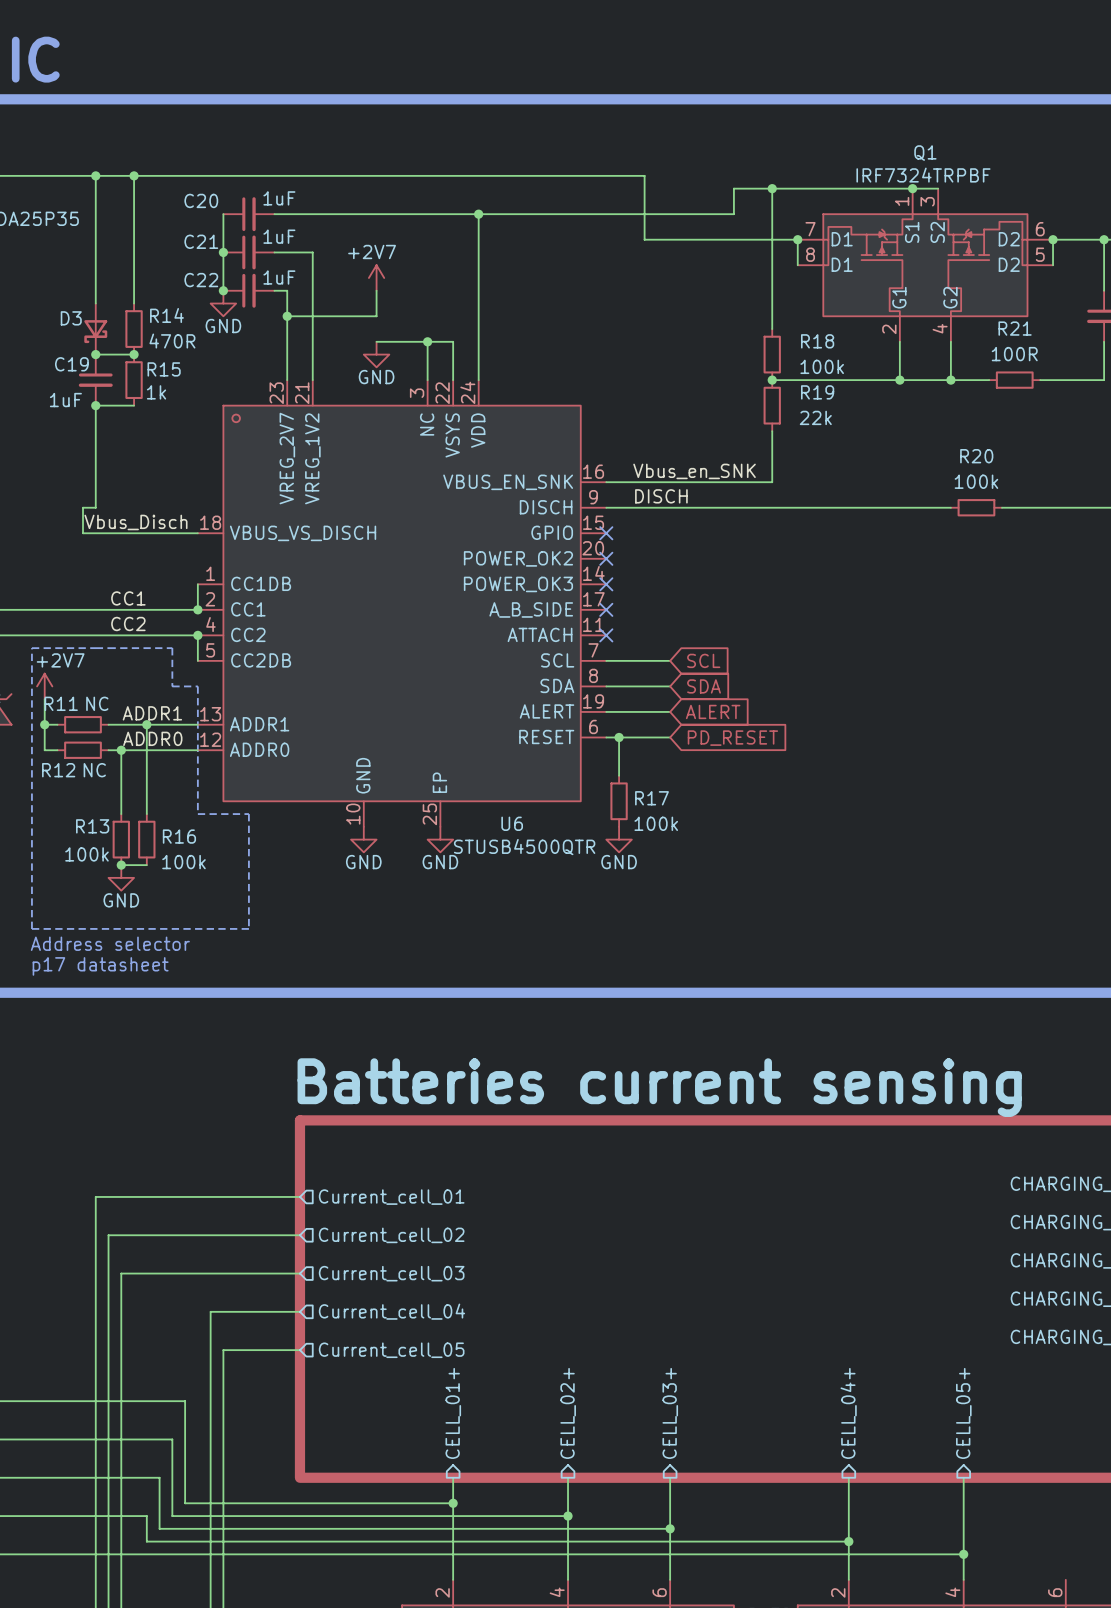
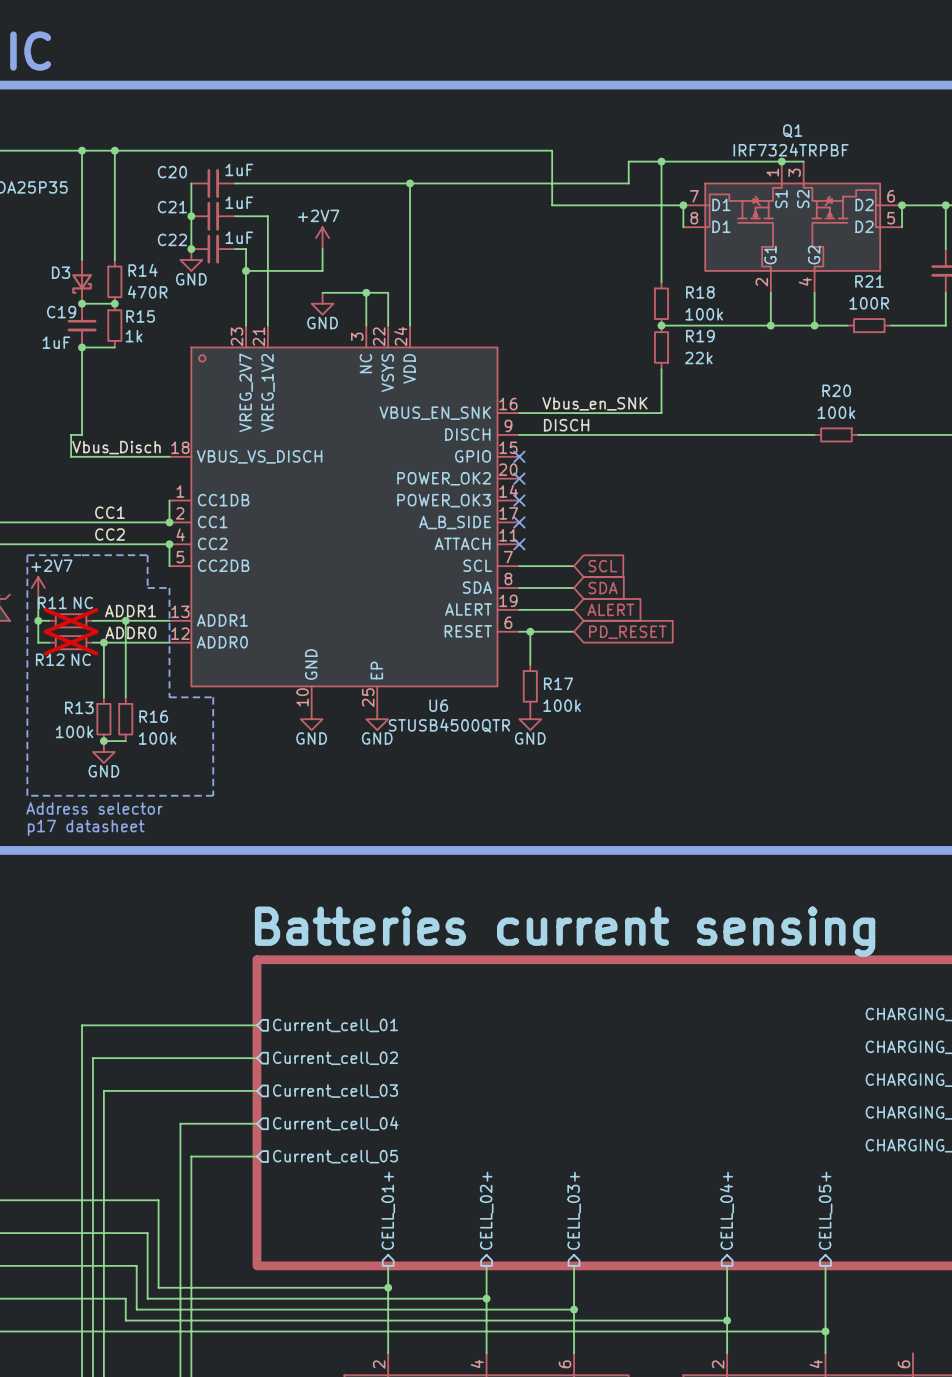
R11 do-not-place cross: none -> (71, 620)
R12 do-not-place cross: none -> (71, 642)

